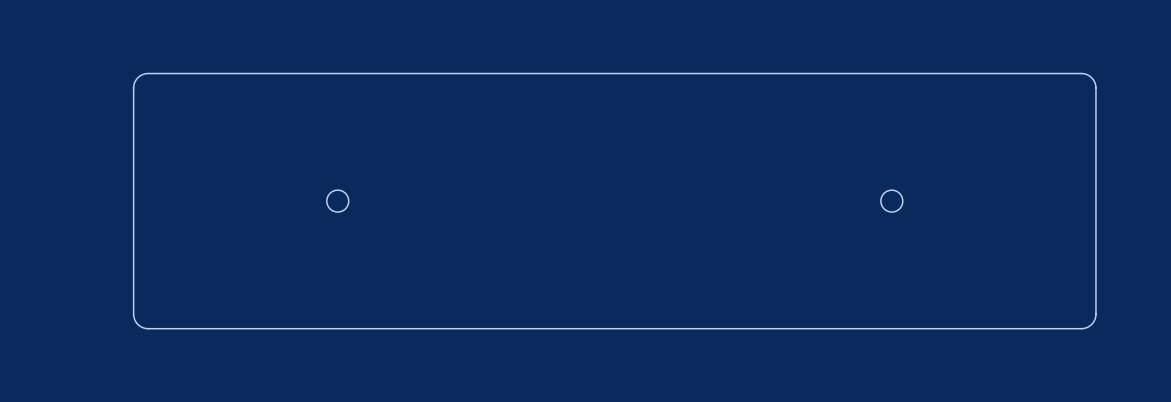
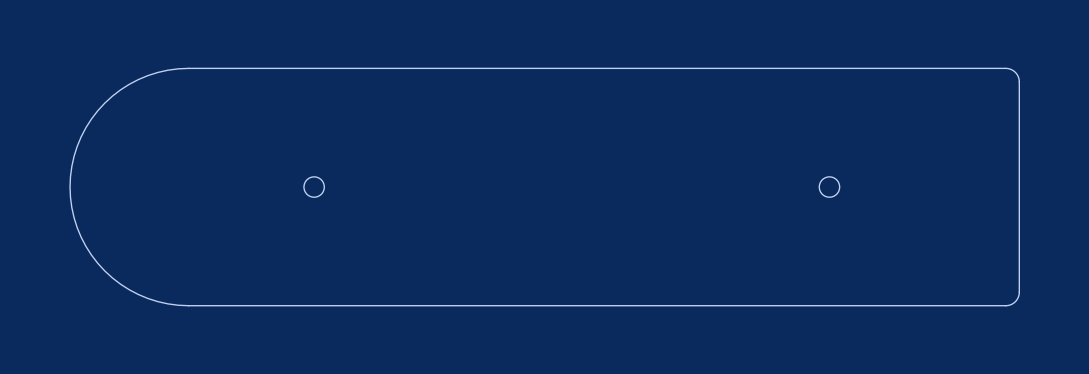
board edge: (202, 73) (144, 73) (136, 79) (133, 88) (133, 317) (137, 324) (146, 328) (202, 328) -> (188, 68) (168, 70) (138, 79) (120, 89) (104, 103) (91, 118) (77, 146) (71, 166) (70, 187) (71, 207) (77, 227) (91, 255) (104, 270) (120, 284) (138, 294) (168, 303) (188, 305)

